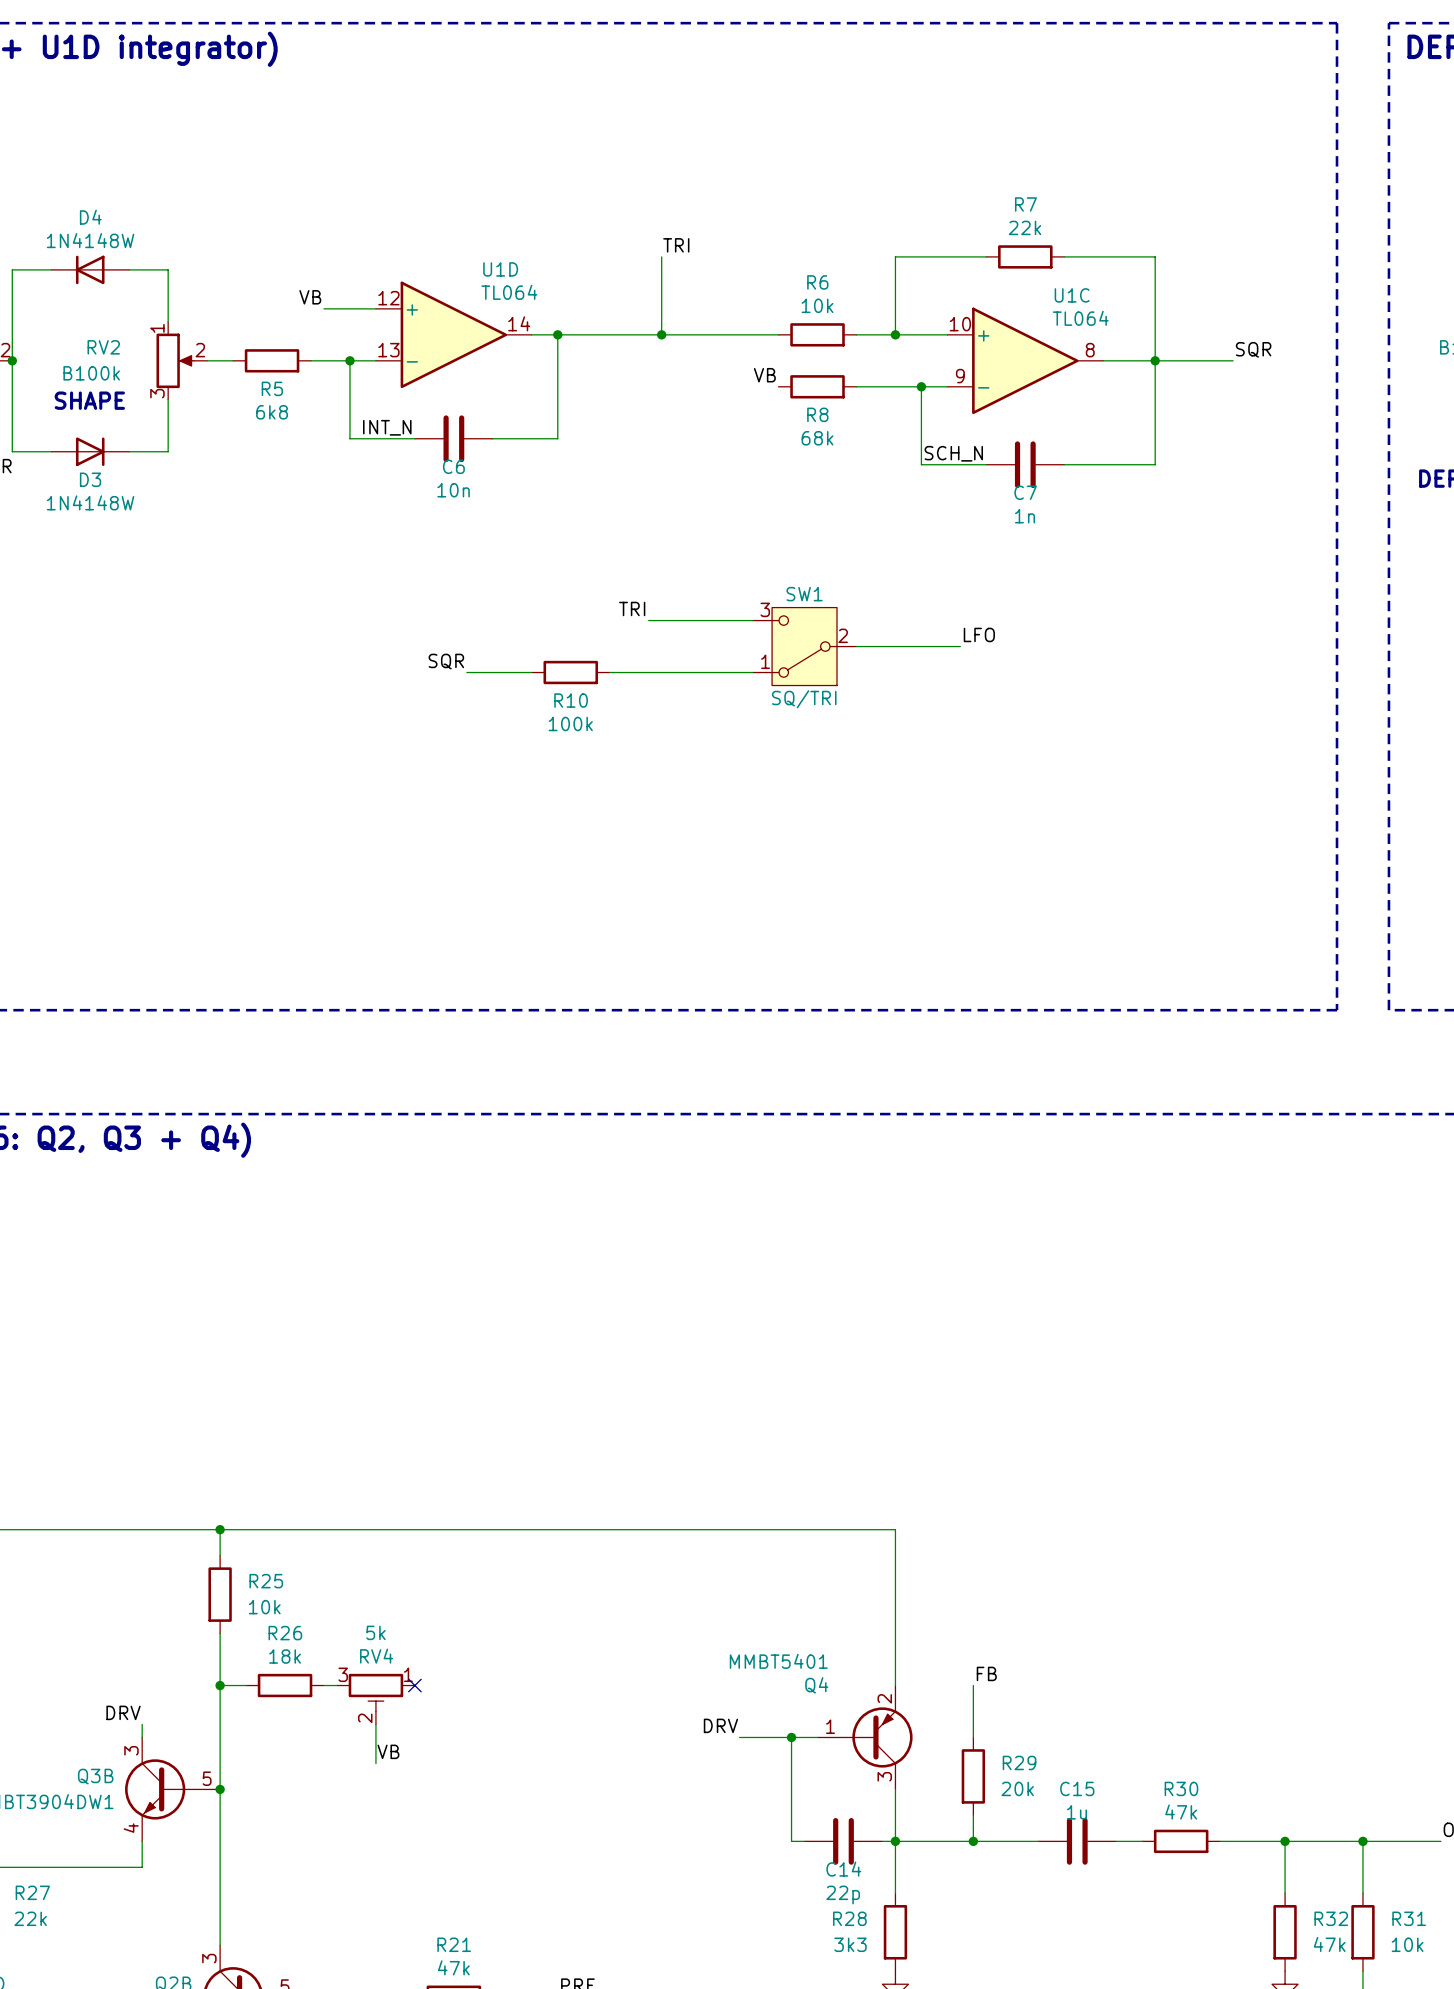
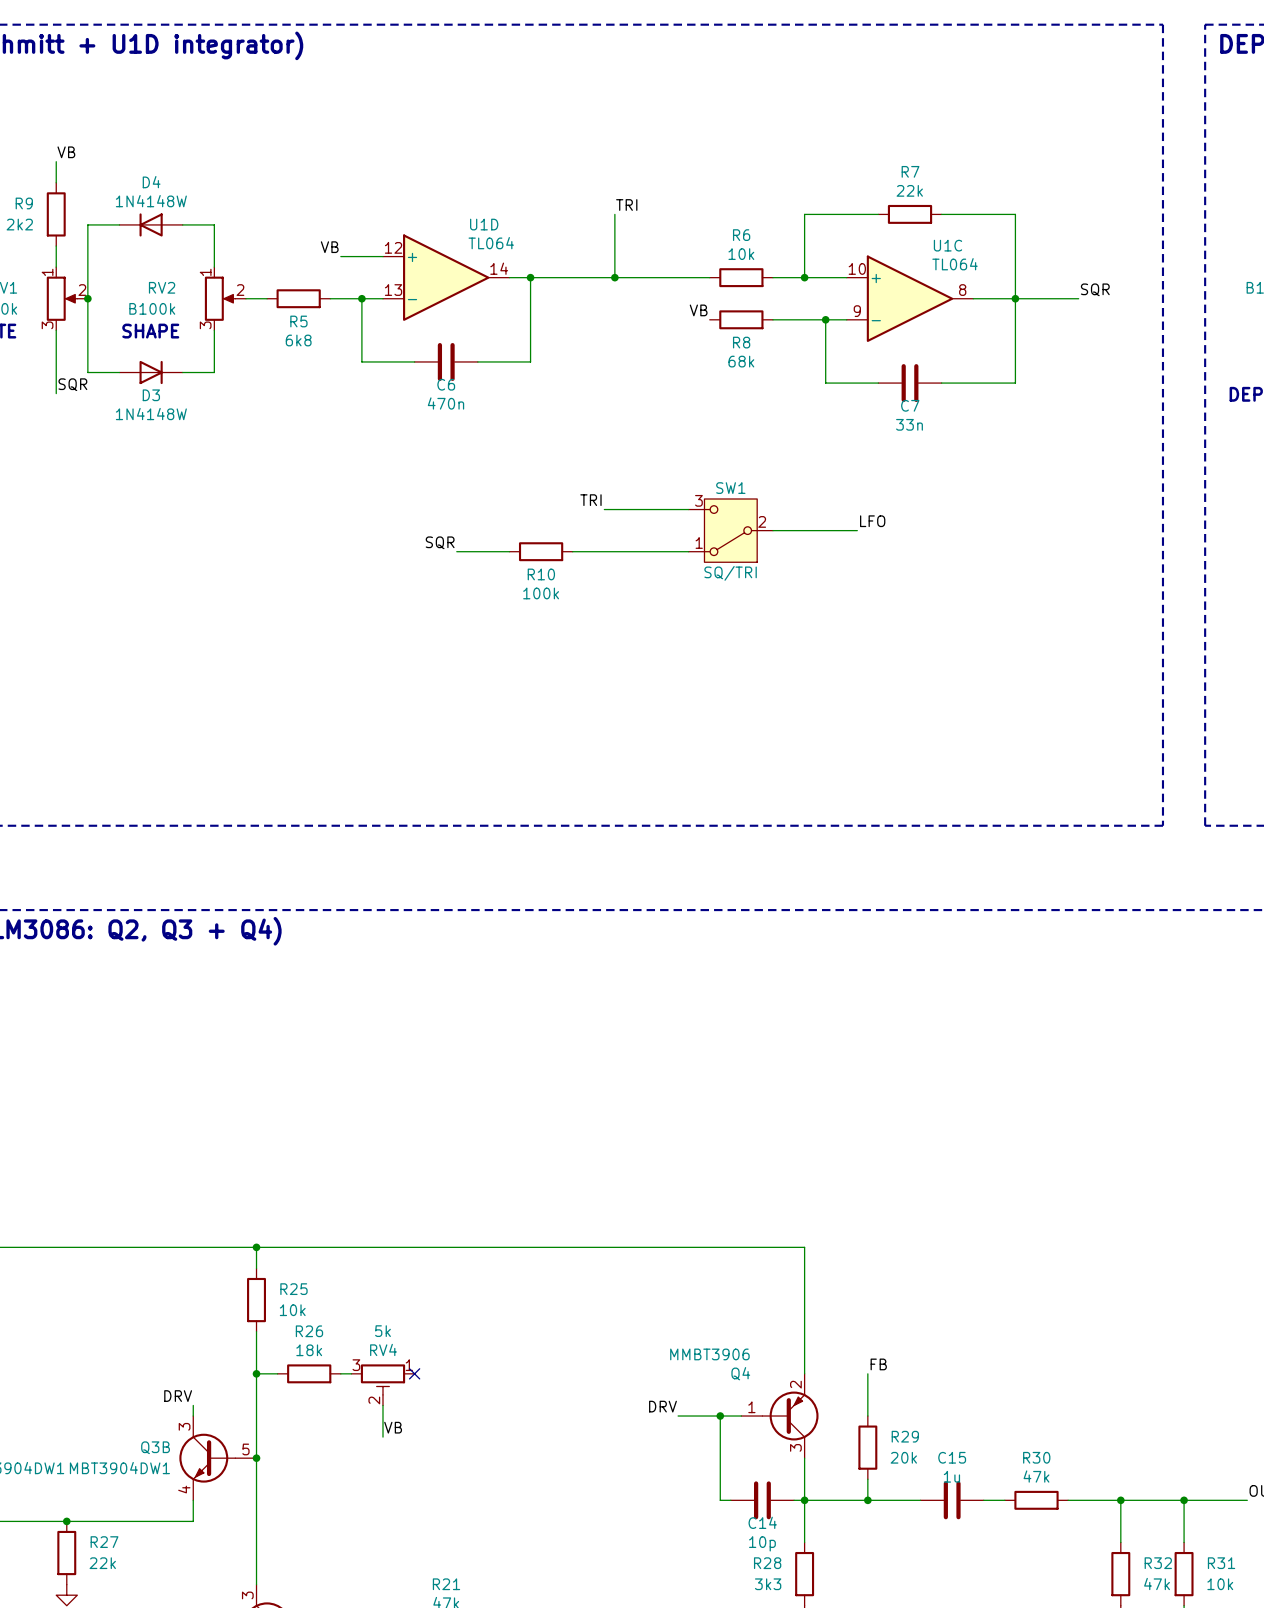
label: INT_N (387, 427) -> none
label: SCH_N (953, 453) -> none
C6 value: 10n (453, 490) -> 470n (445, 403)
C7 value: 1n (1025, 516) -> 33n (909, 424)
Q4 value: MMBT5401 (778, 1661) -> MMBT3906 (709, 1354)
C14 value: 22p (843, 1895) -> 10p (762, 1543)

